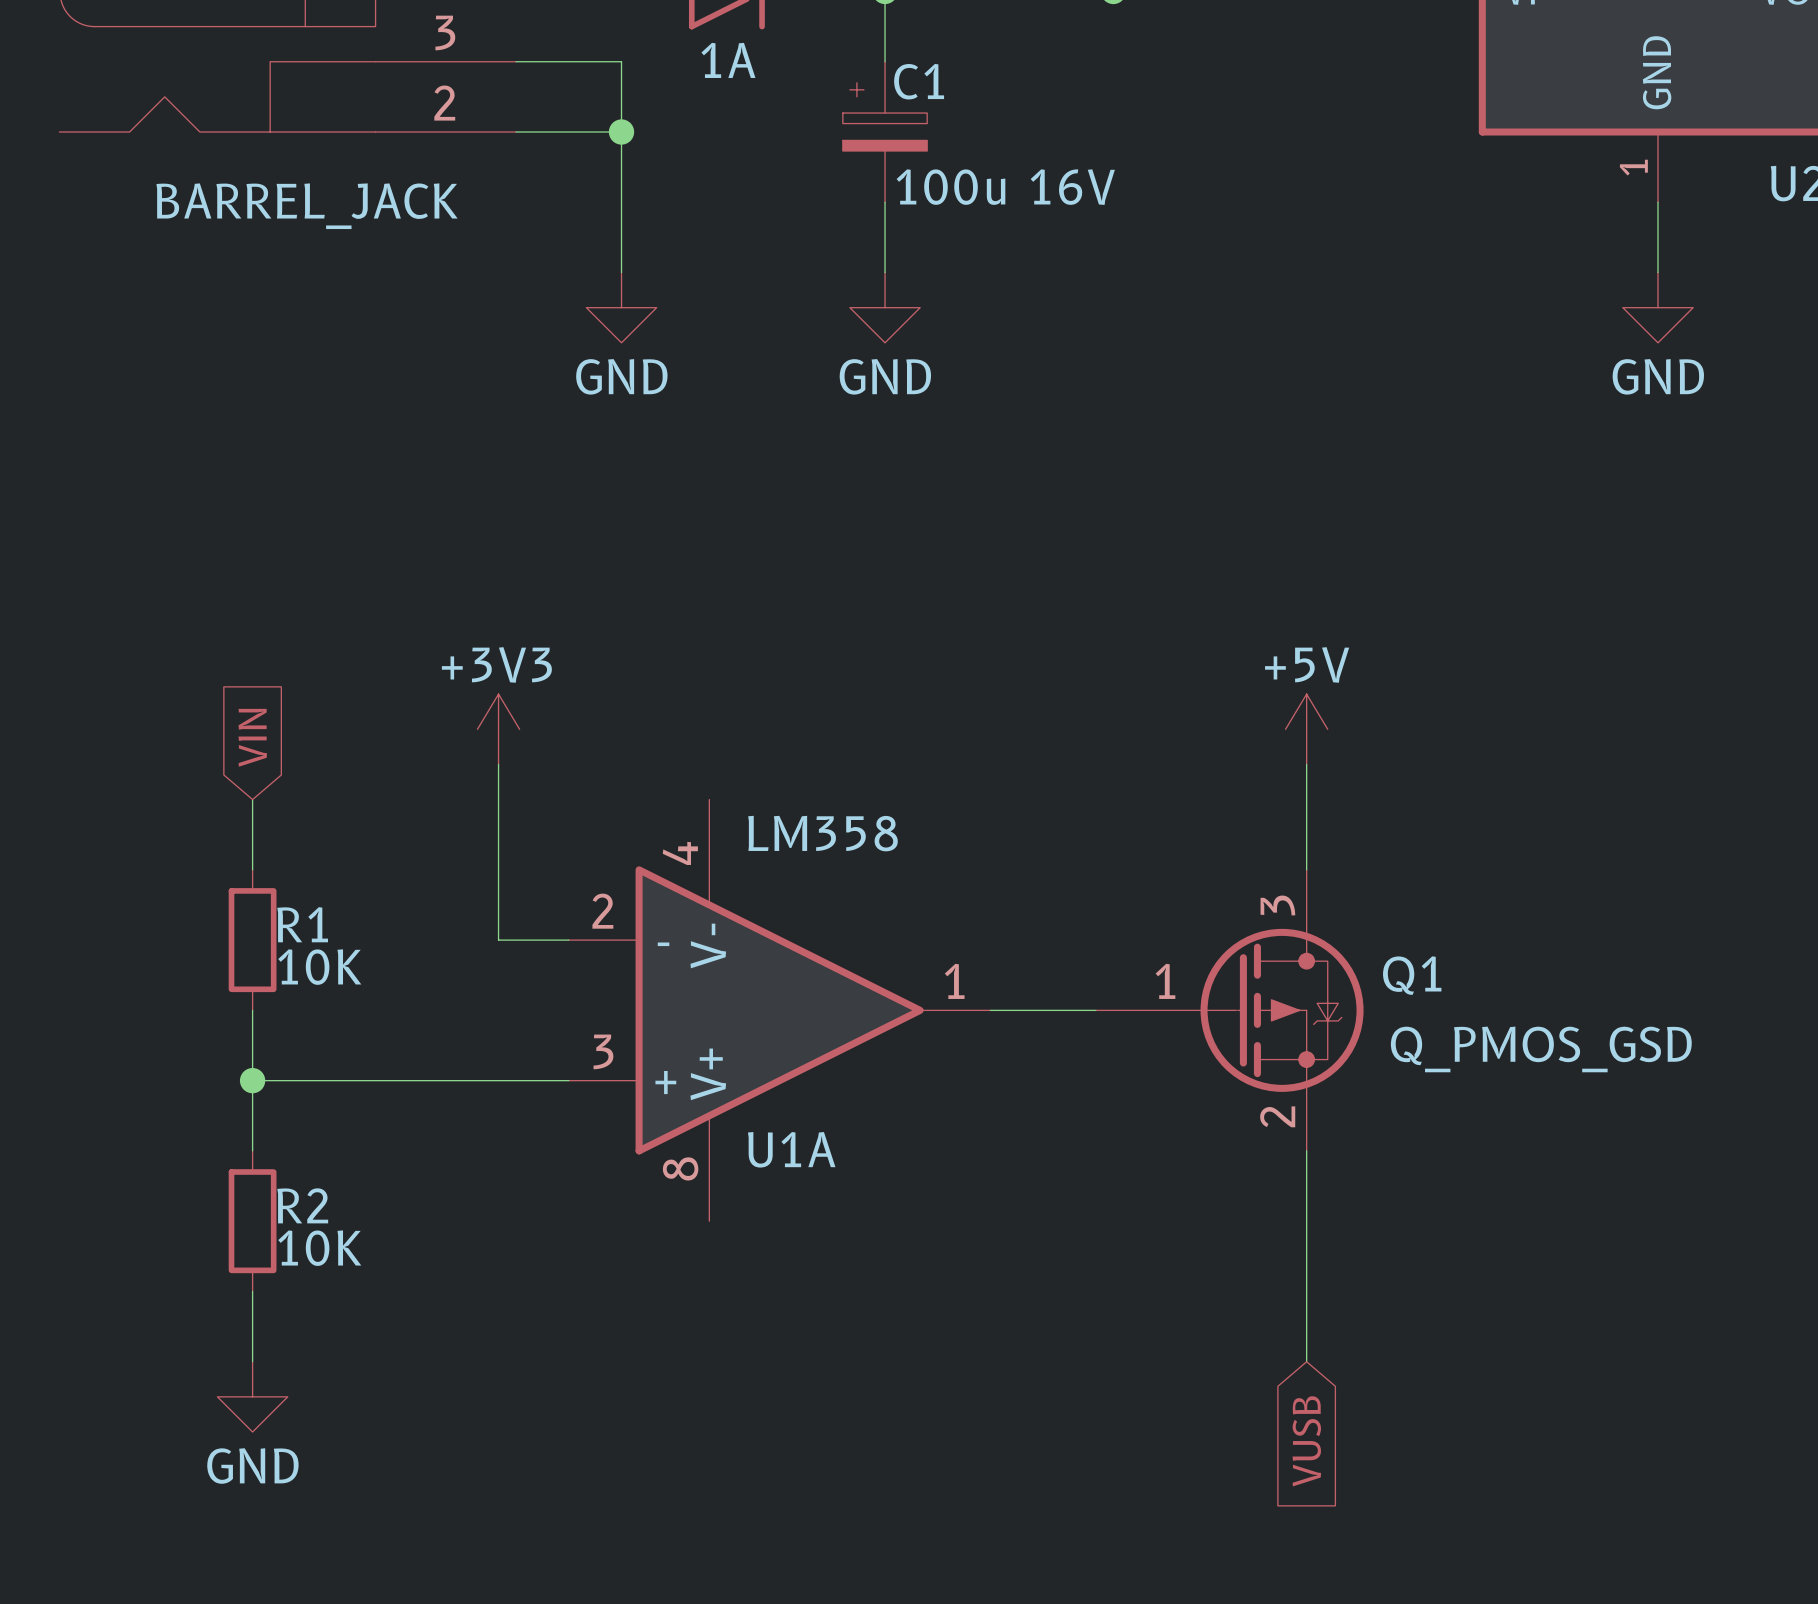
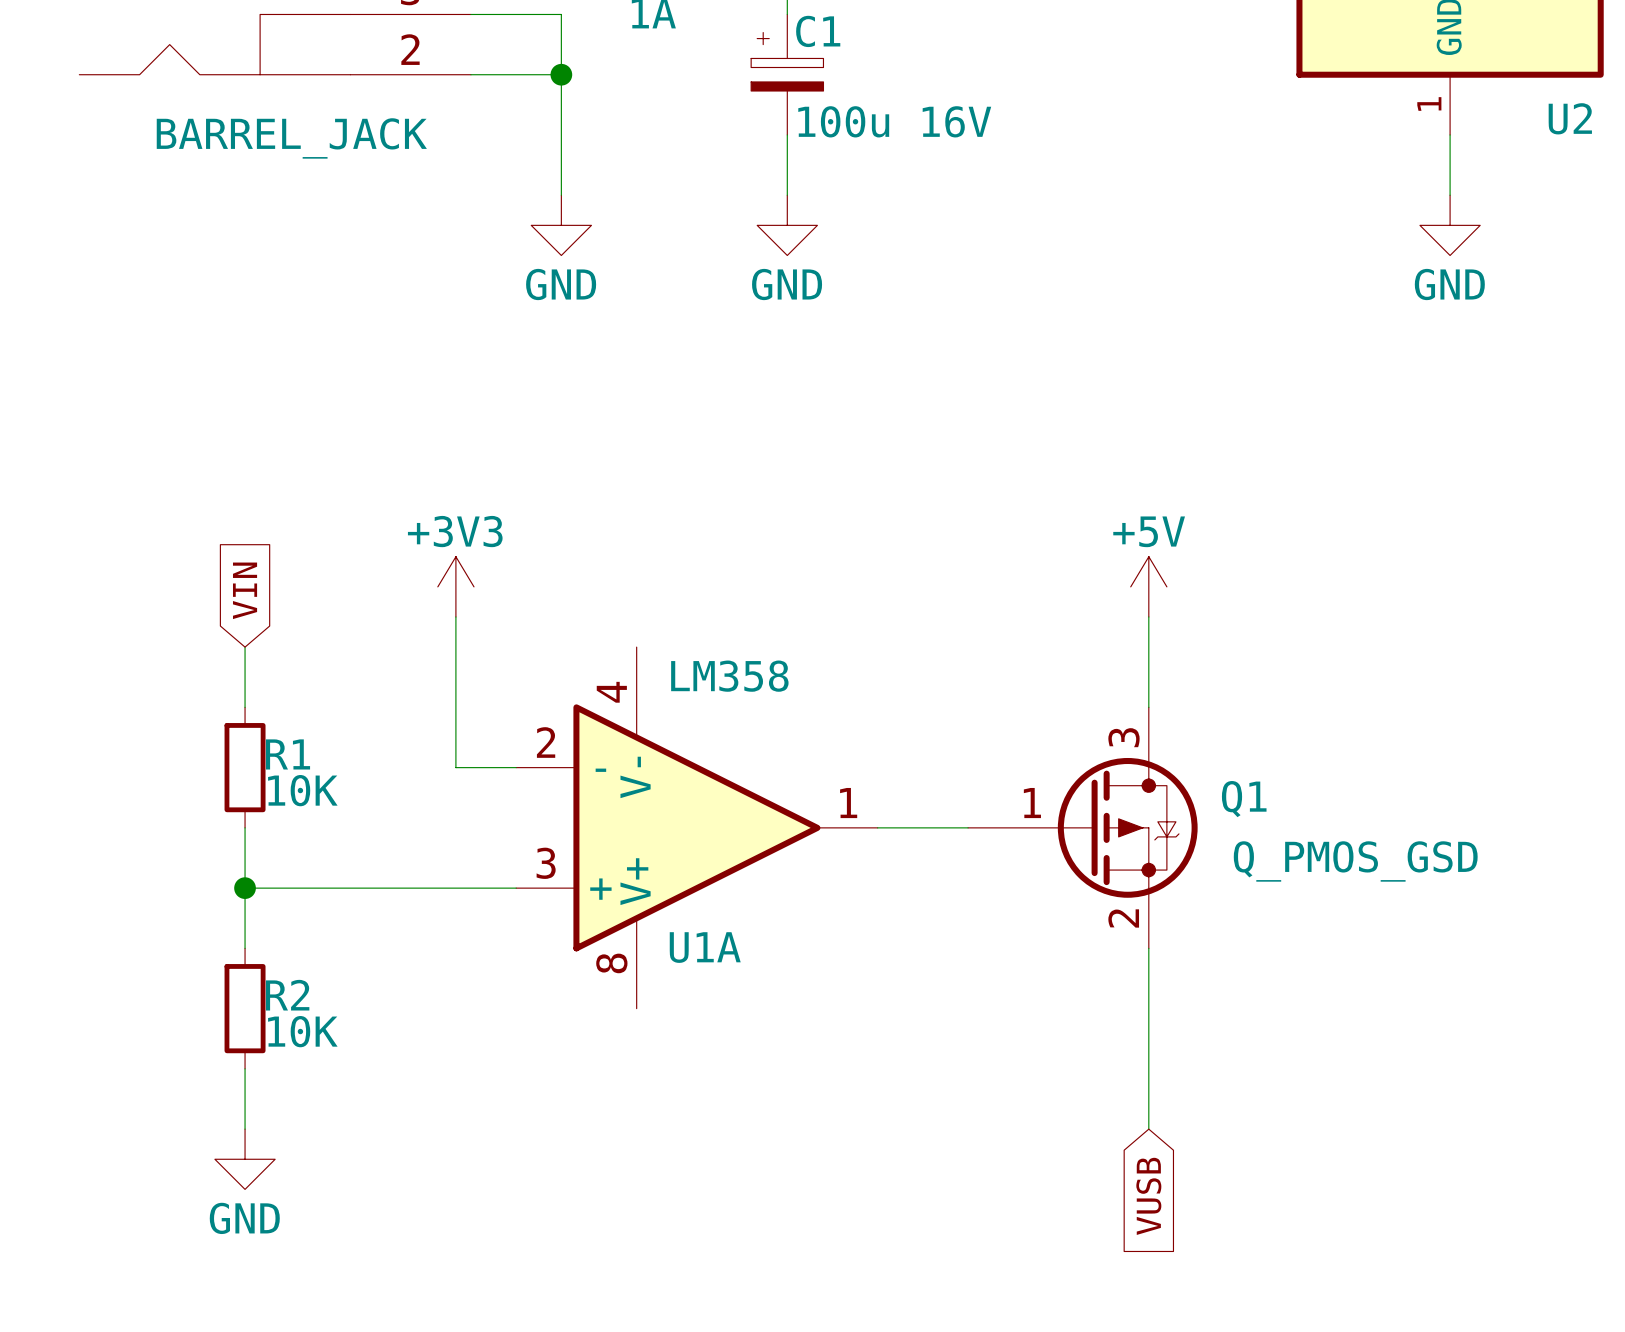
Q1 symbol: [1095, 869, 1364, 1151] -> [968, 707, 1198, 949]

